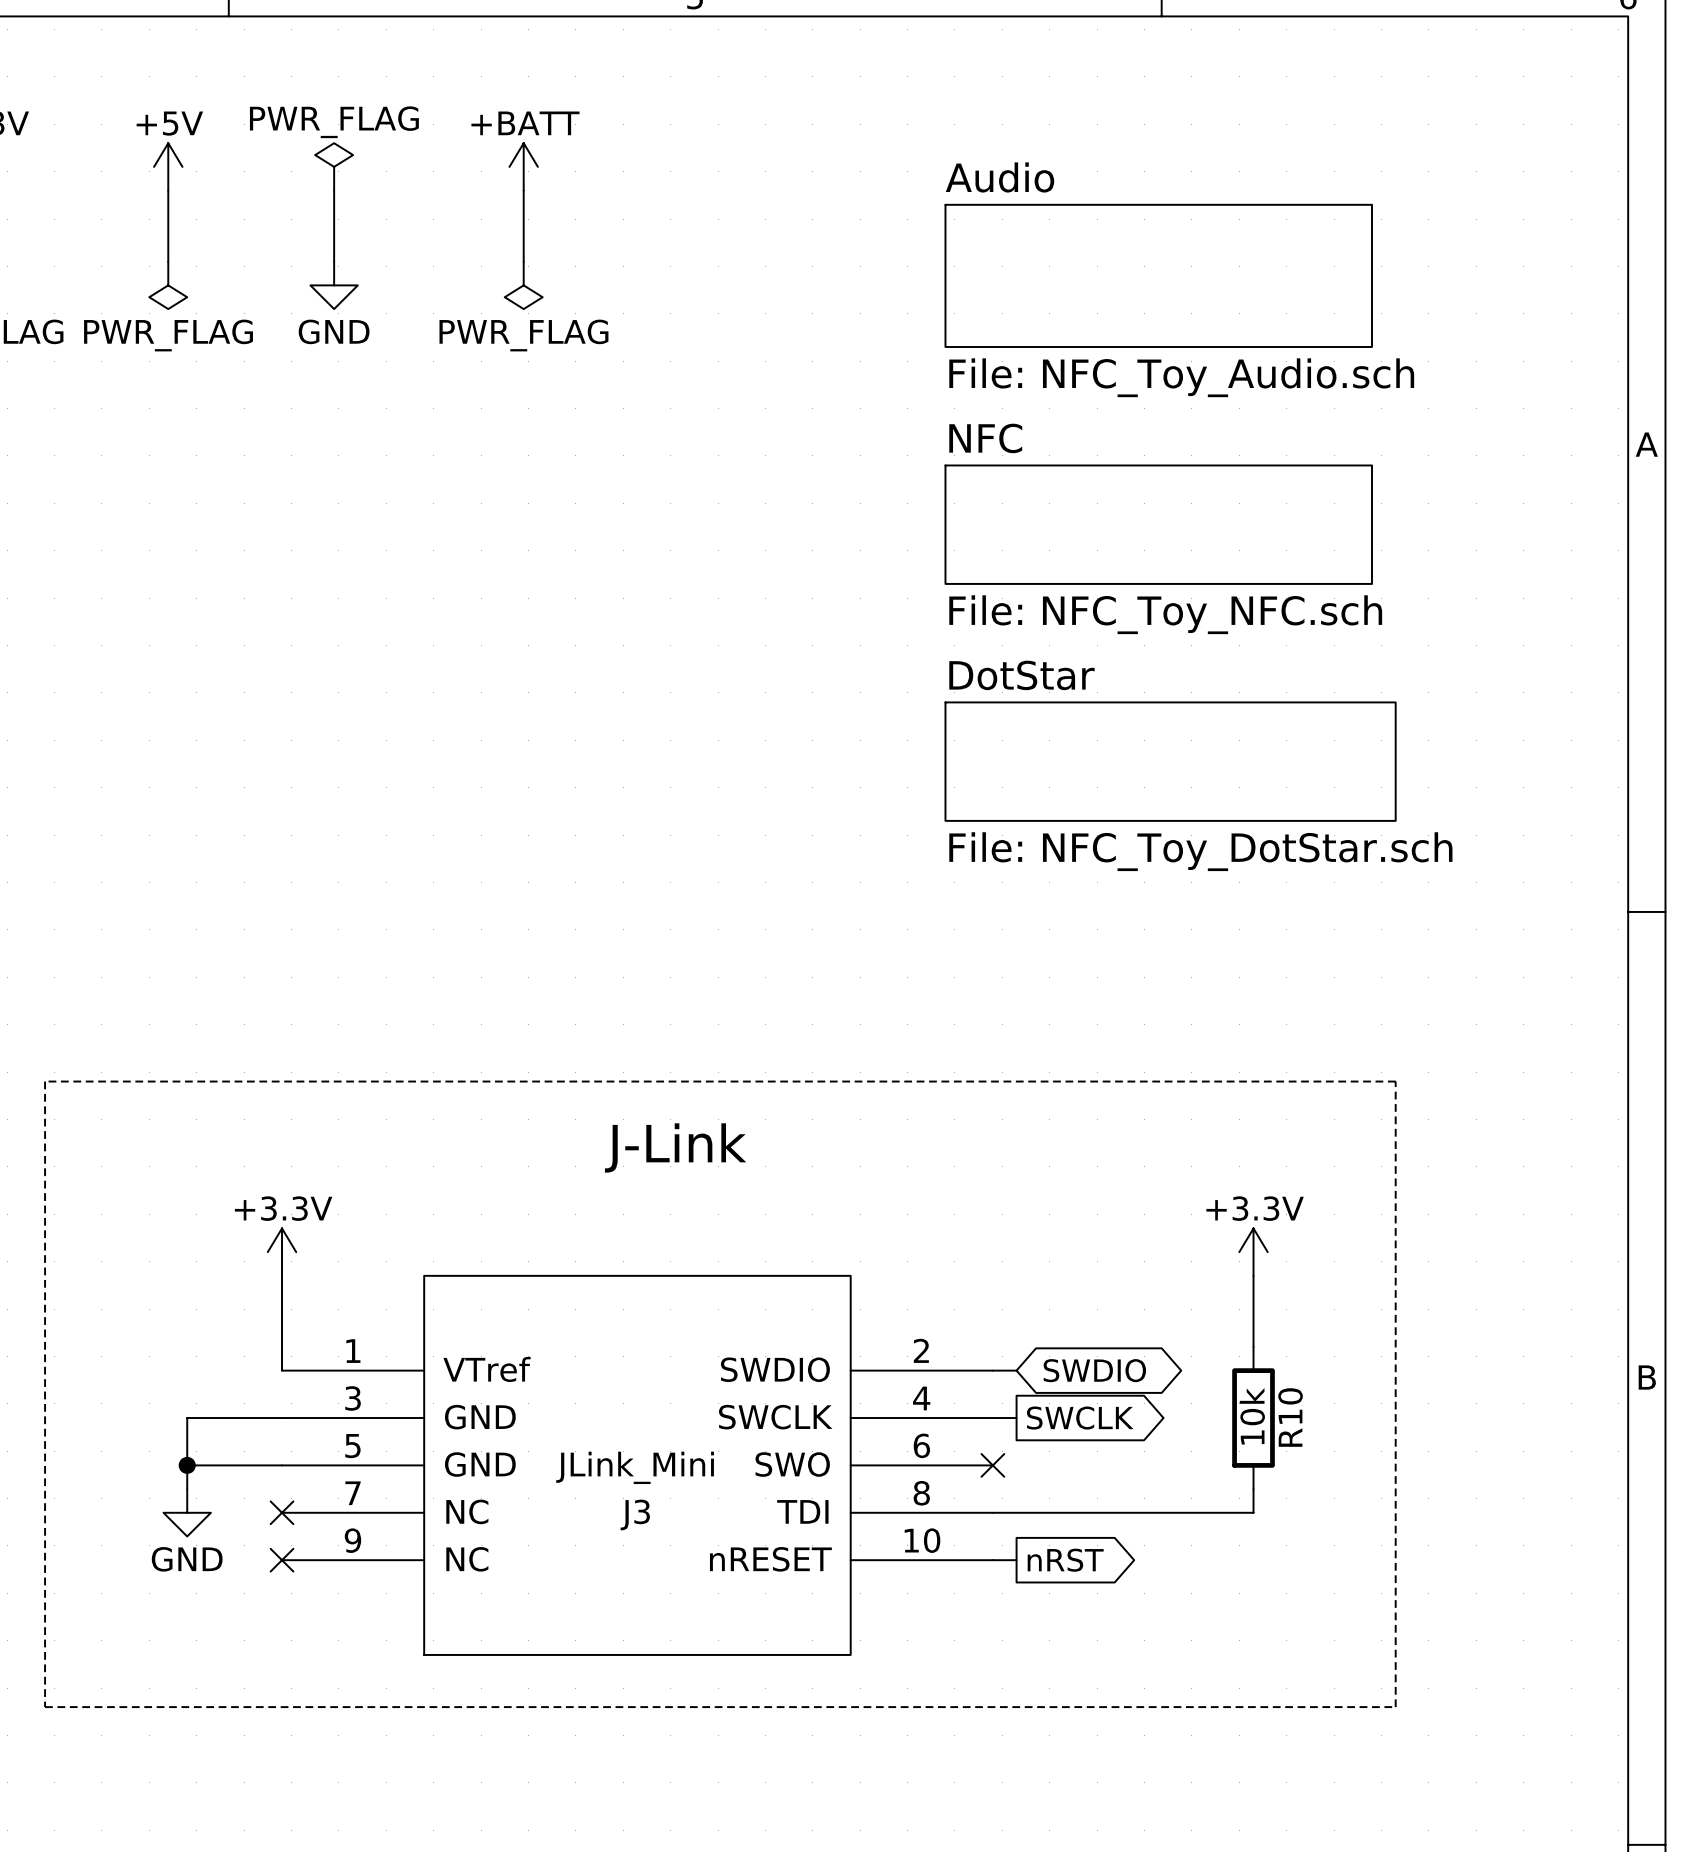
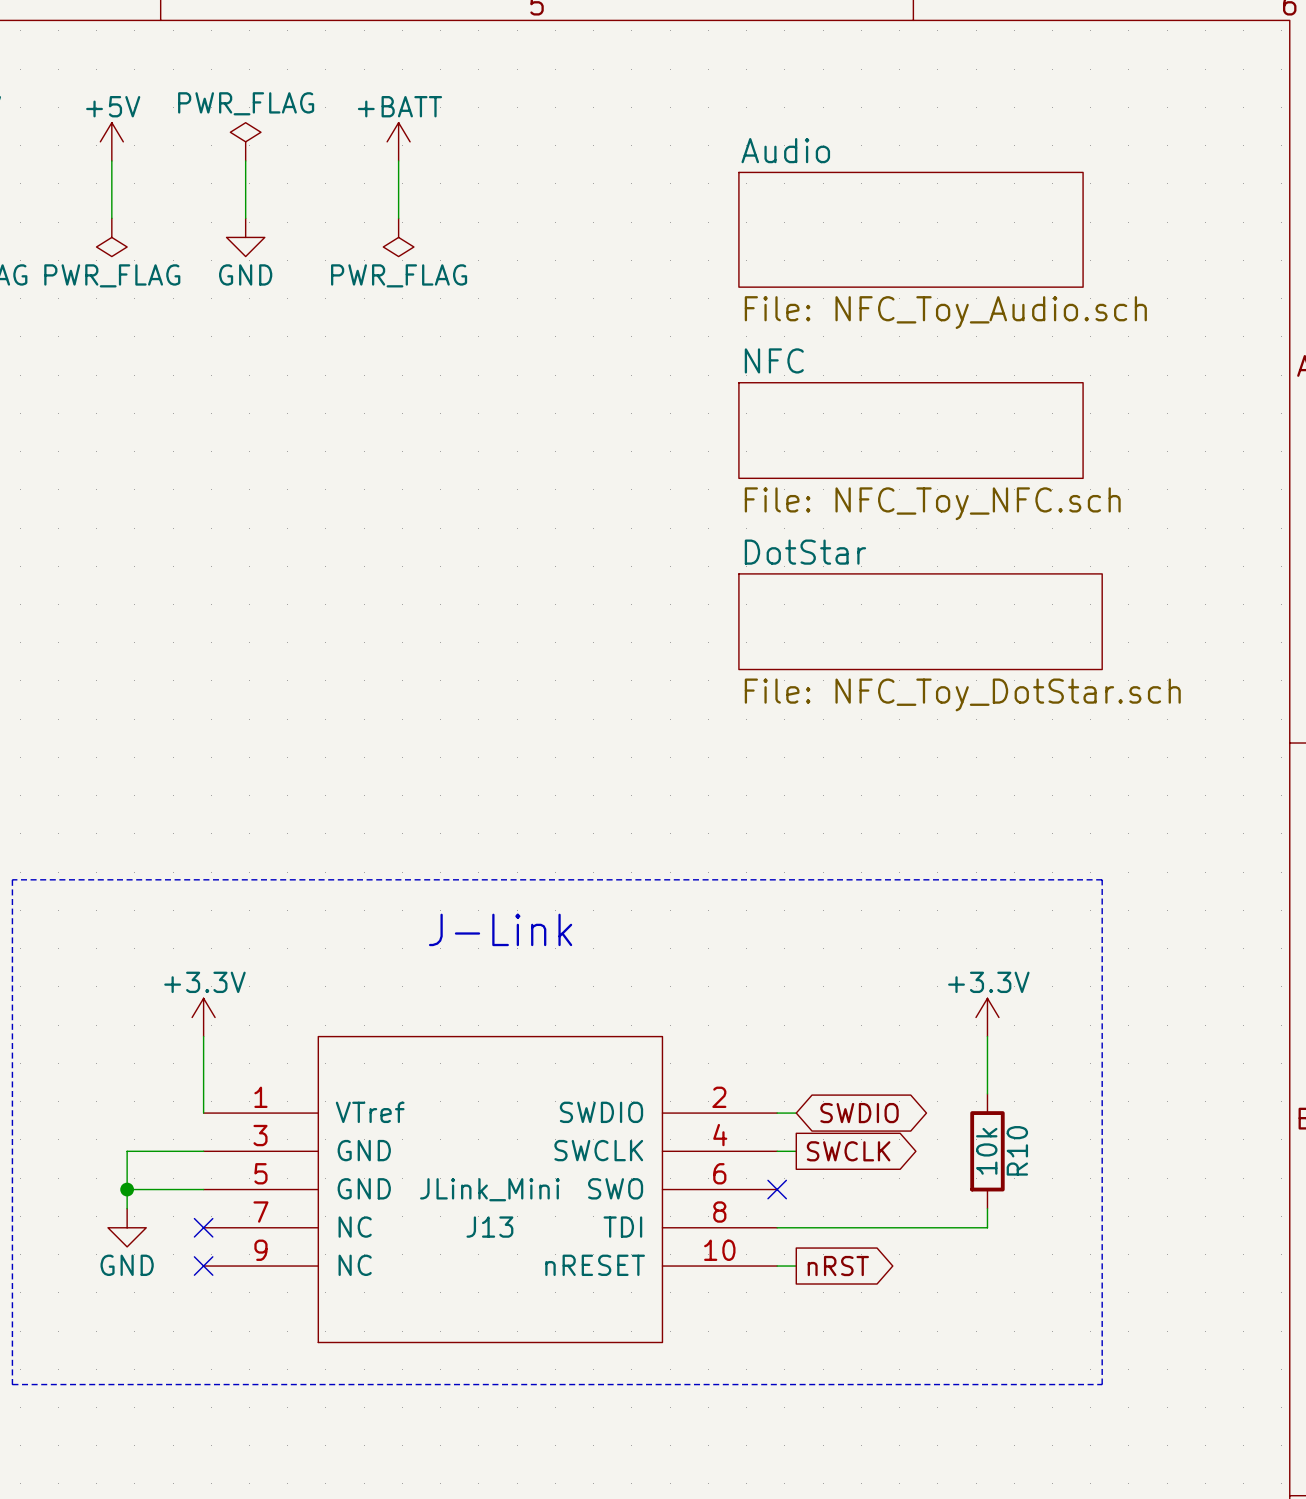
J3 name: J3 (635, 1514) -> J13 (489, 1227)

